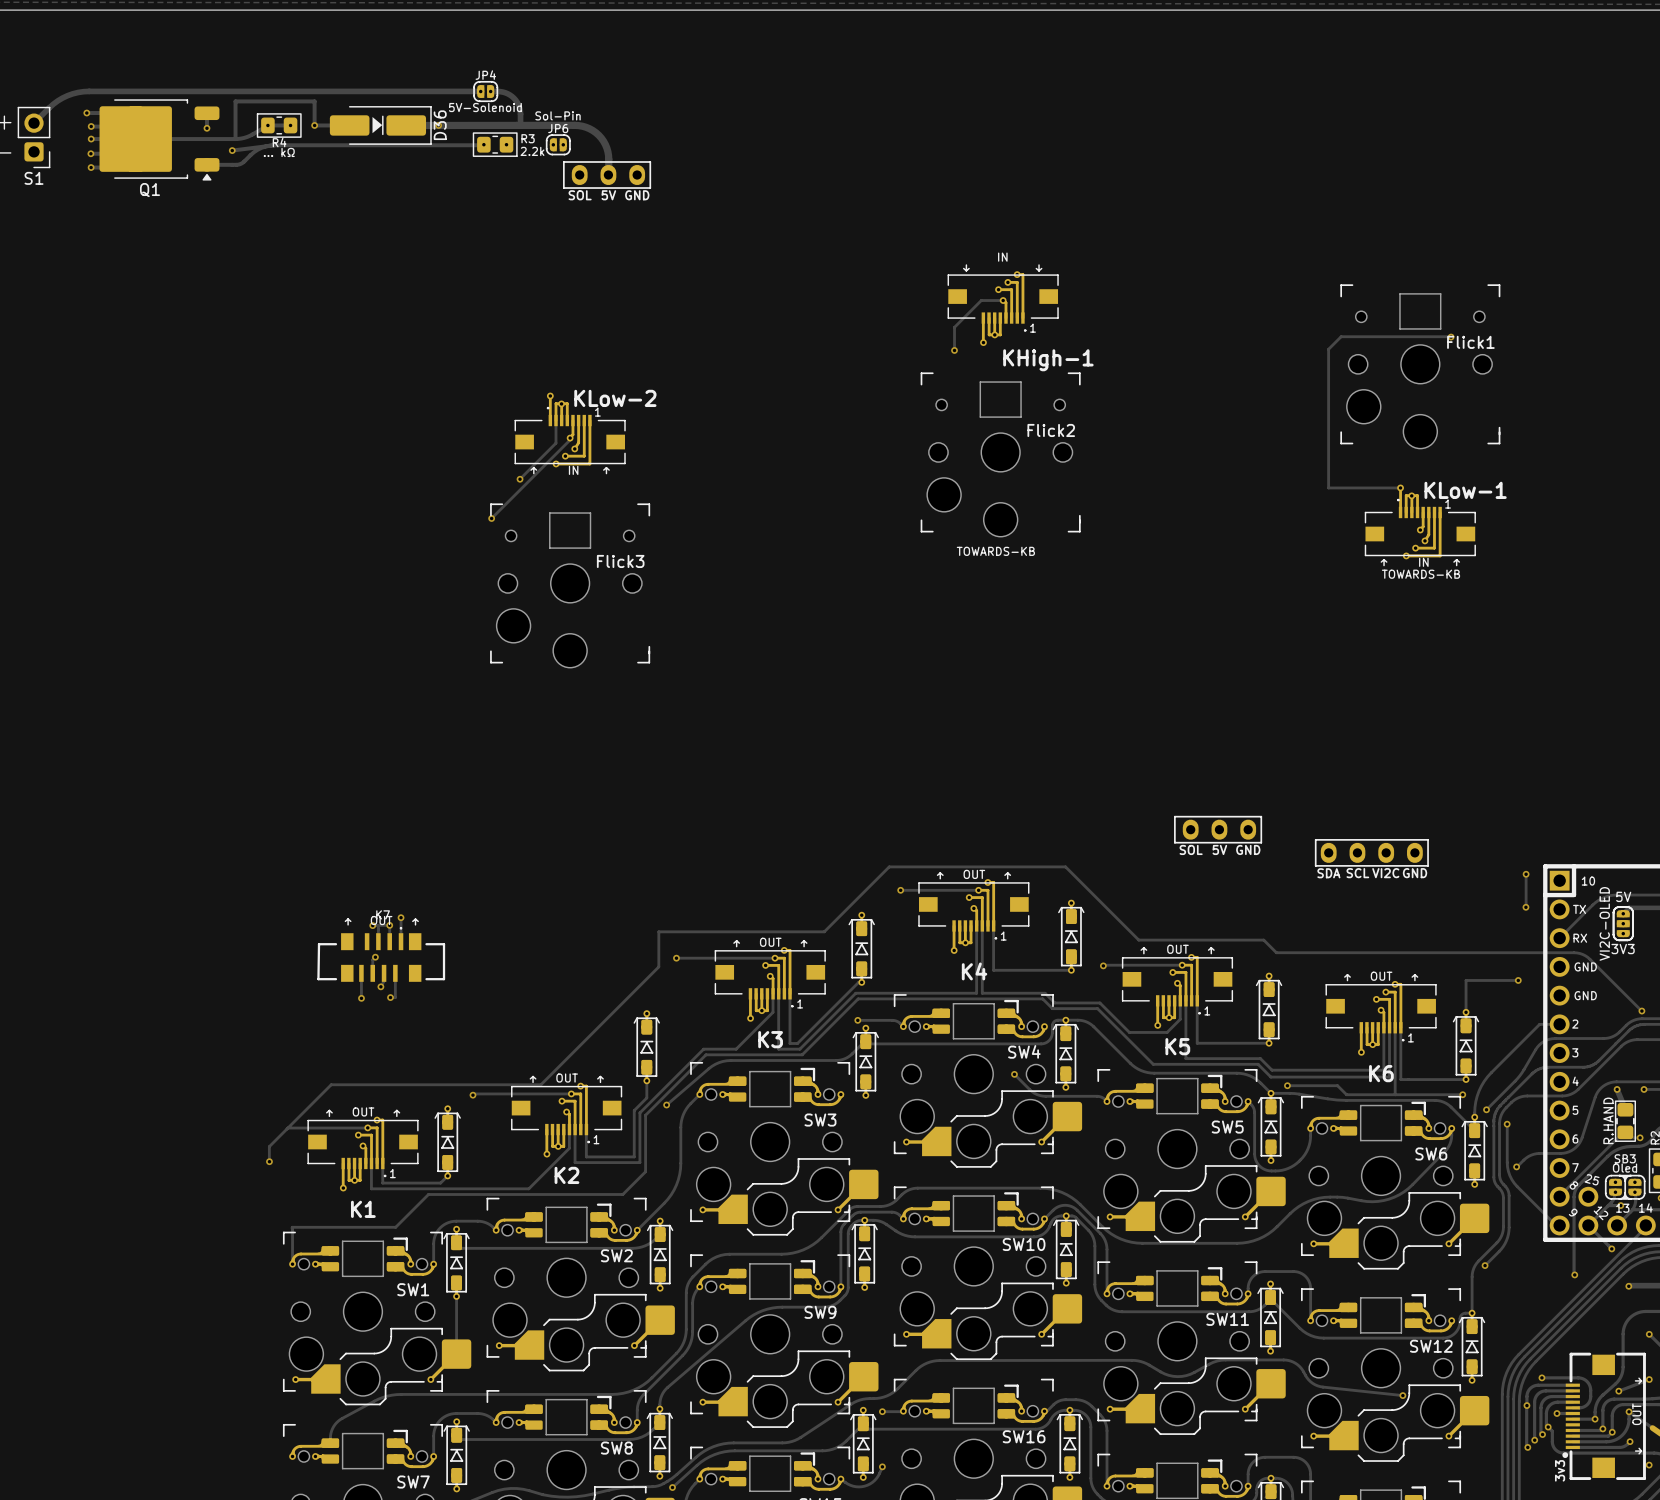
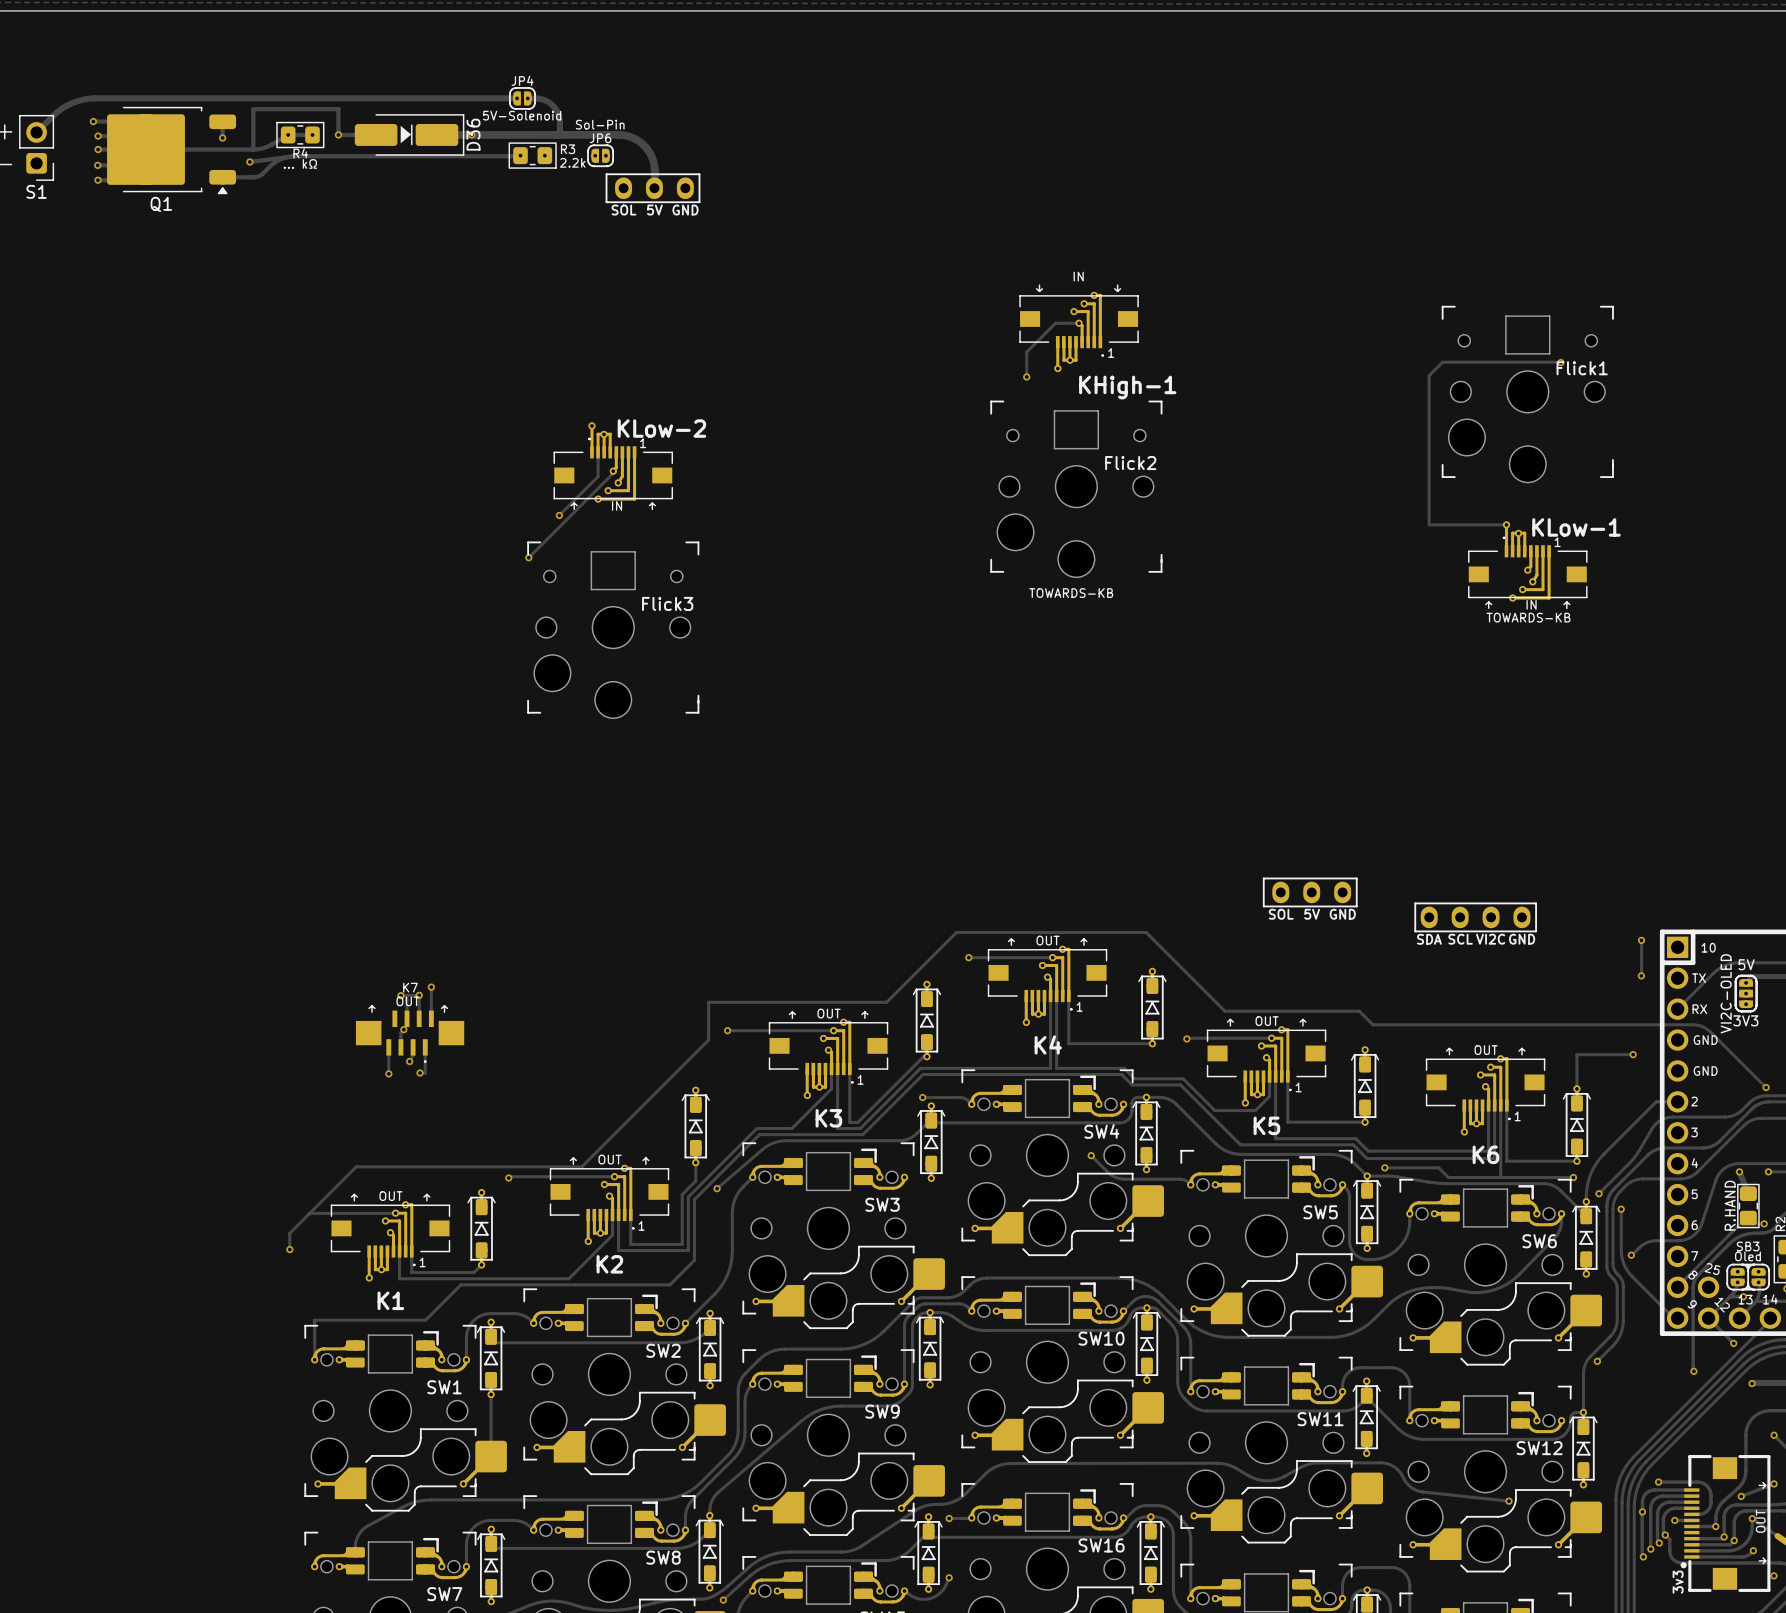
K7 footprint: [317, 918, 446, 982] -> [355, 1005, 465, 1063]

